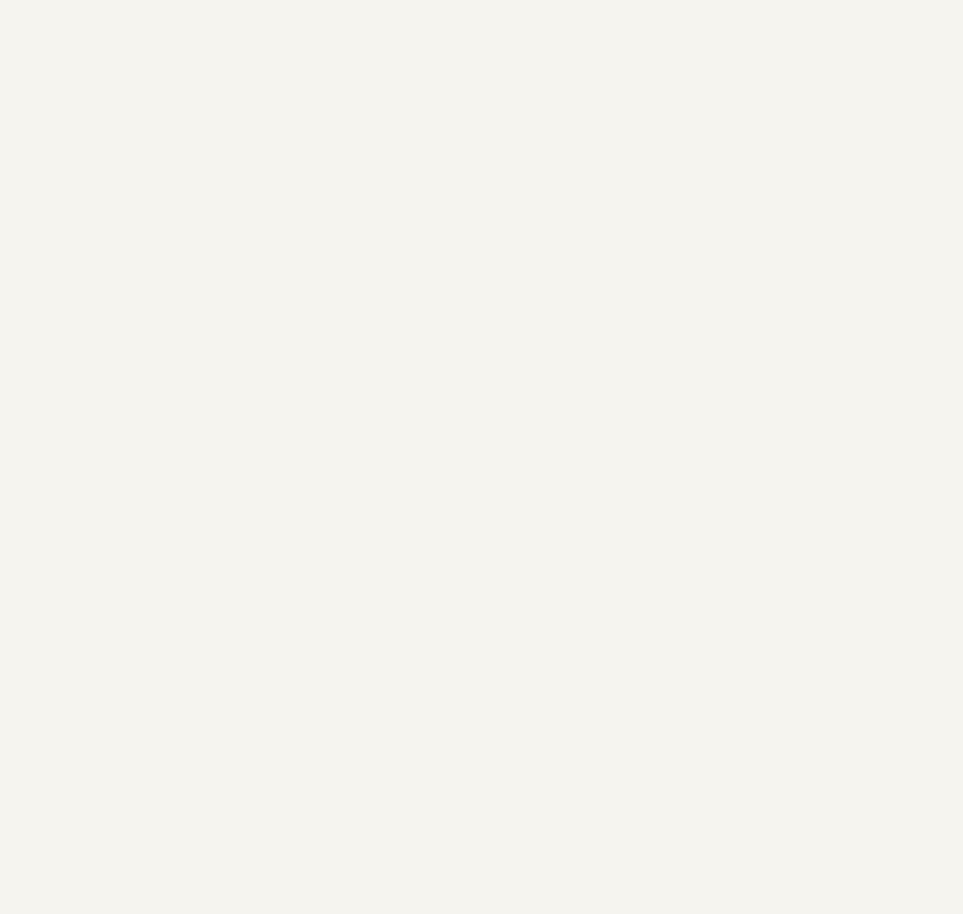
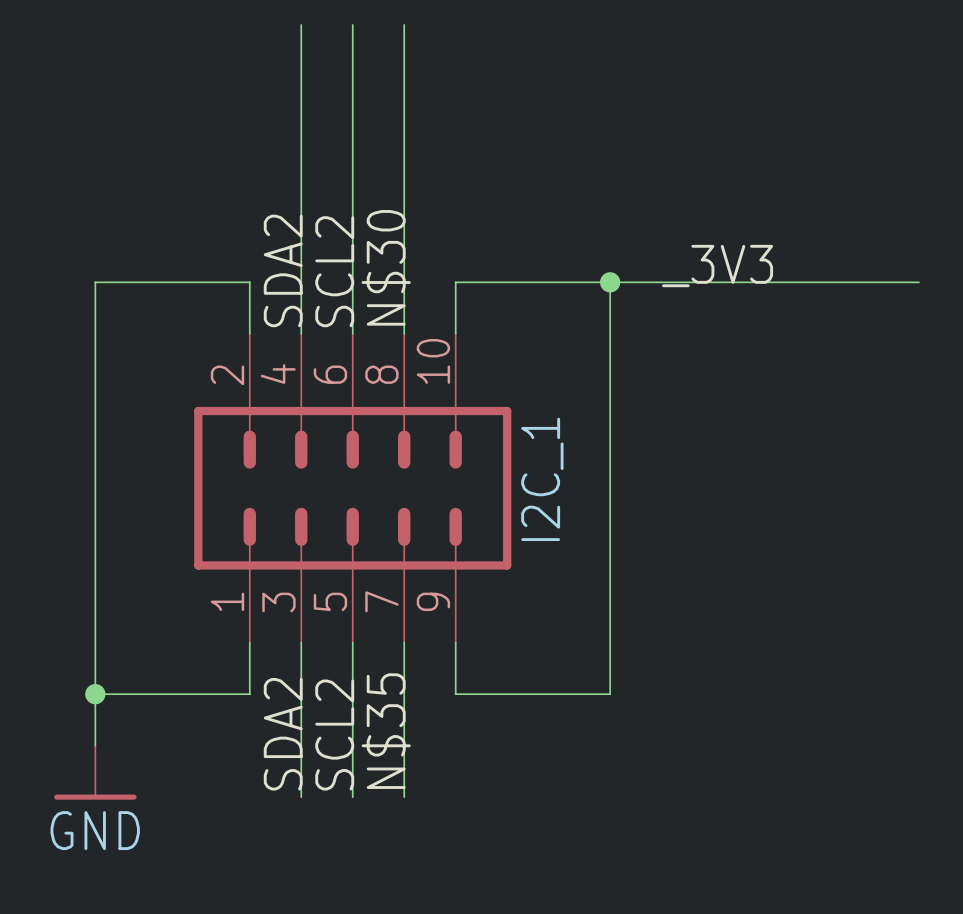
wire: none -> (301, 24) (301, 333)
wire: none -> (352, 24) (352, 333)
wire: none -> (404, 24) (404, 333)
label: none -> _3V3 (717, 266)
label: none -> SDA2 (283, 270)
label: none -> SCL2 (334, 271)
label: none -> N$30 (386, 267)
wire: none -> (610, 282) (610, 694) (455, 694) (455, 642)
junction: none -> (610, 282)
wire: none -> (919, 282) (455, 282) (455, 333)
wire: none -> (249, 333) (249, 282) (95, 282) (95, 745)
I2C_1: none -> (352, 488)
wire: none -> (249, 642) (249, 694) (95, 694)
wire: none -> (301, 642) (301, 797)
wire: none -> (352, 642) (352, 797)
wire: none -> (404, 642) (404, 797)
junction: none -> (95, 694)
label: none -> SDA2 (283, 734)
label: none -> SCL2 (334, 735)
label: none -> N$35 (386, 731)
power symbol: none -> GND (95, 772)

